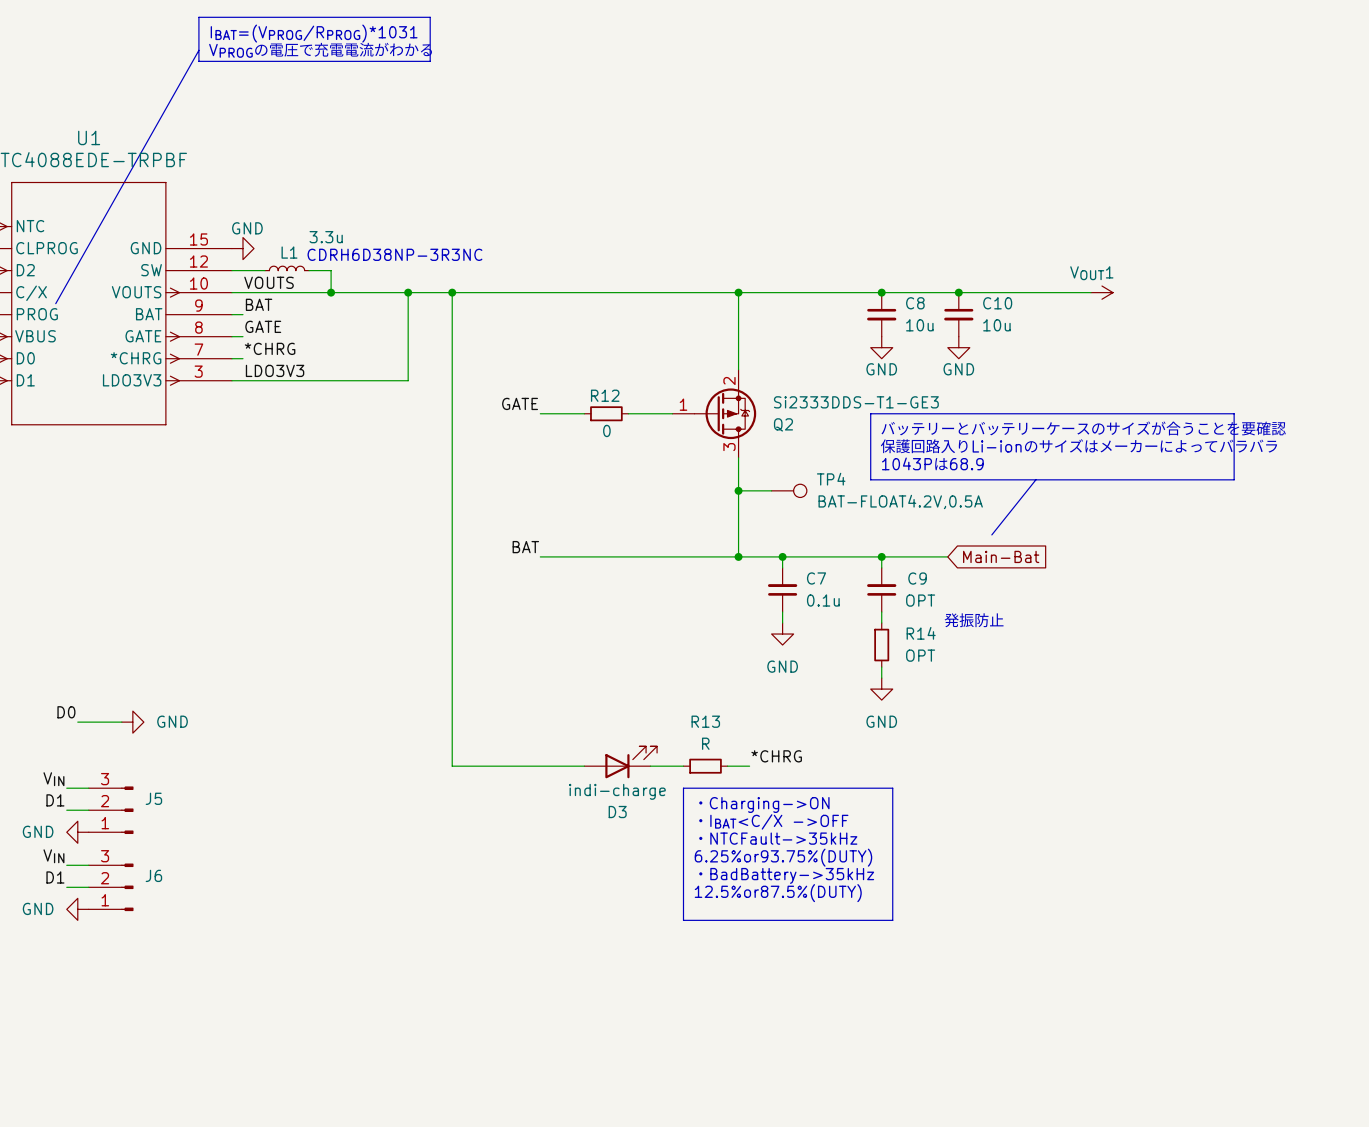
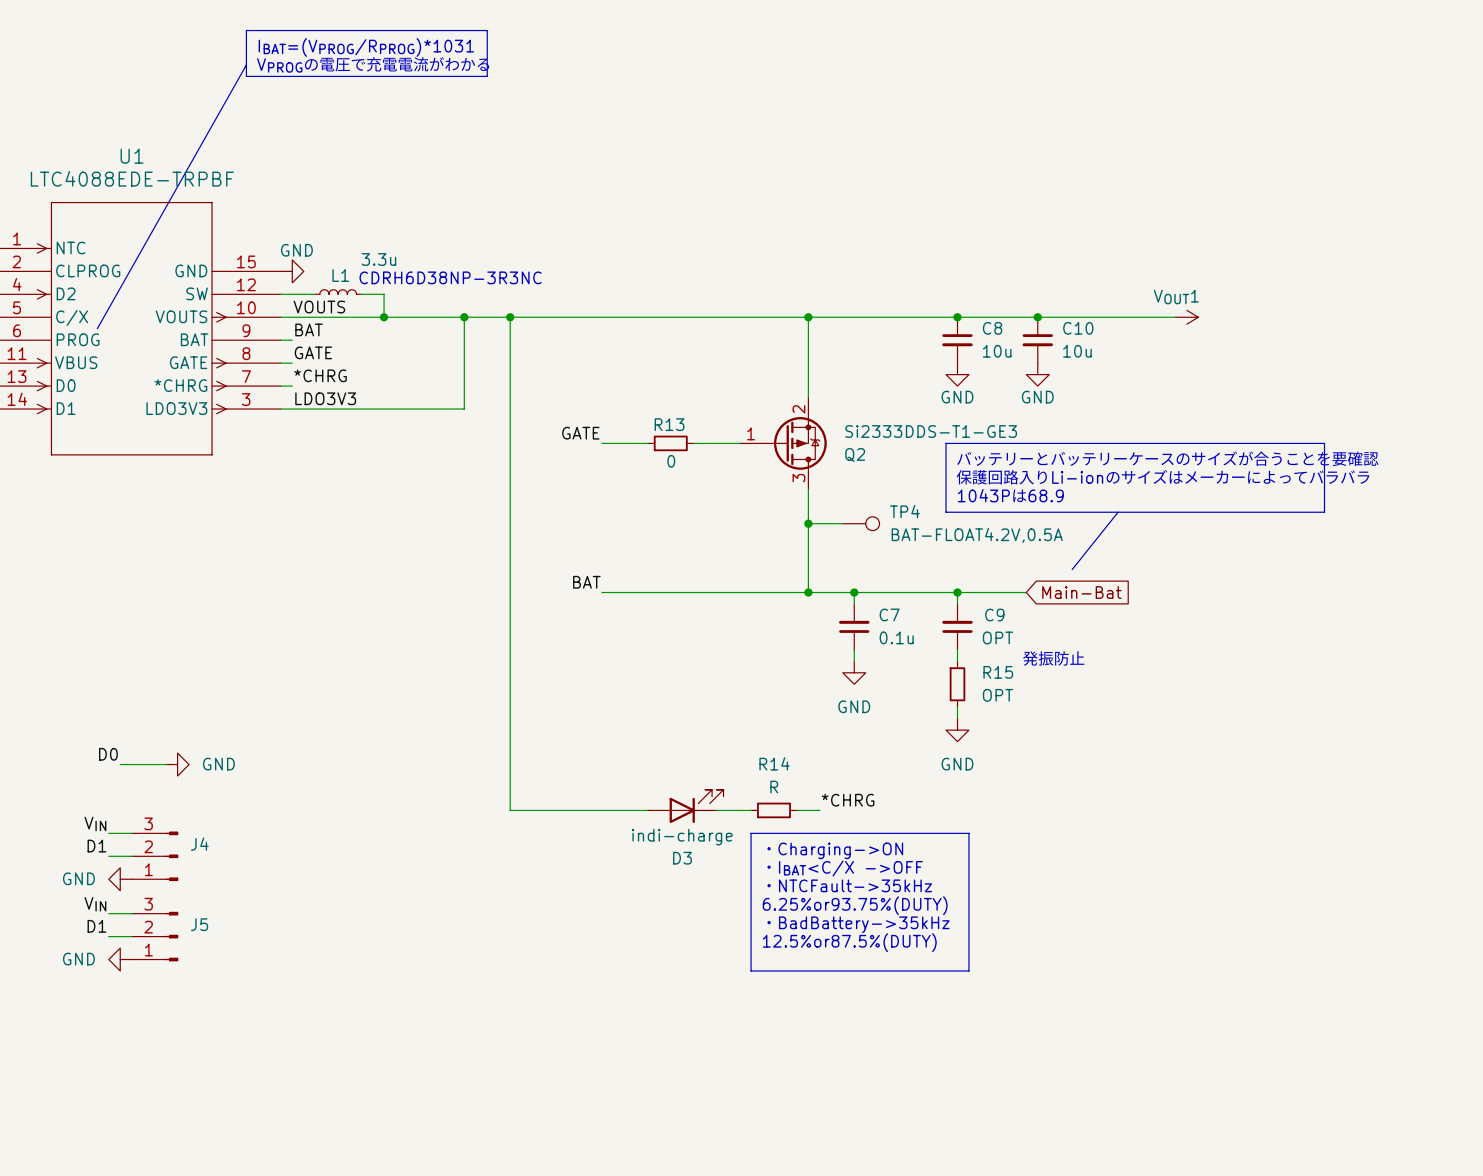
R12 name: R12 (605, 395) -> R13 (669, 424)
R14 name: R14 (921, 633) -> R15 (998, 672)
R13 name: R13 (705, 721) -> R14 (774, 763)
J5 name: J5 (153, 798) -> J4 (199, 844)
J6 name: J6 (153, 875) -> J5 (199, 924)

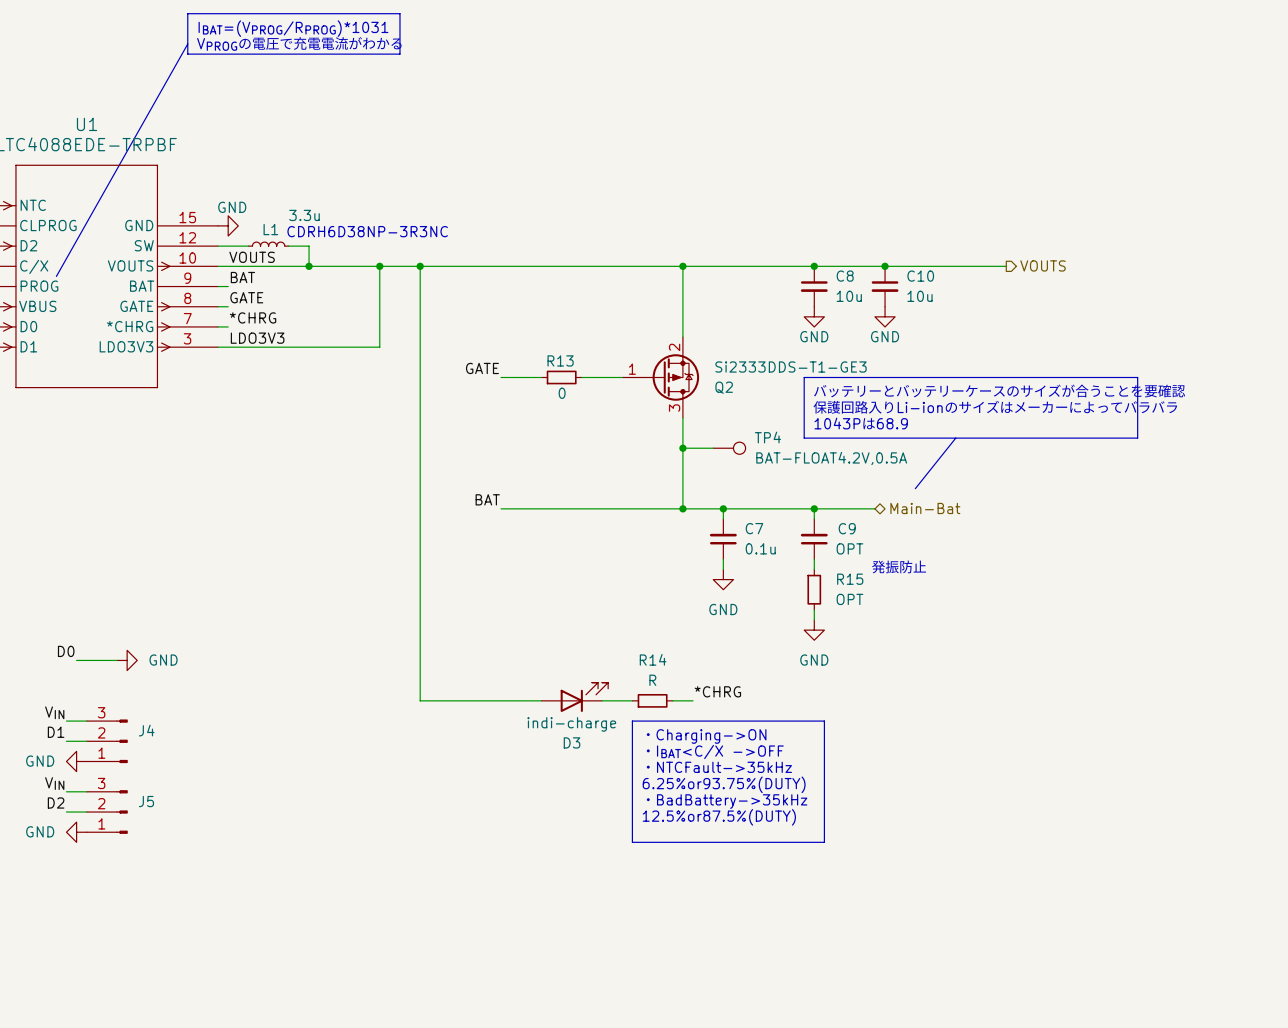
hierarchical label: none -> VOUTS (1043, 265)
power symbol: VOUT1 (1186, 317) -> none
global label: Main-Bat (1081, 592) -> none
hierarchical label: none -> Main-Bat (925, 508)
label: D1 (96, 926) -> D2 (56, 803)

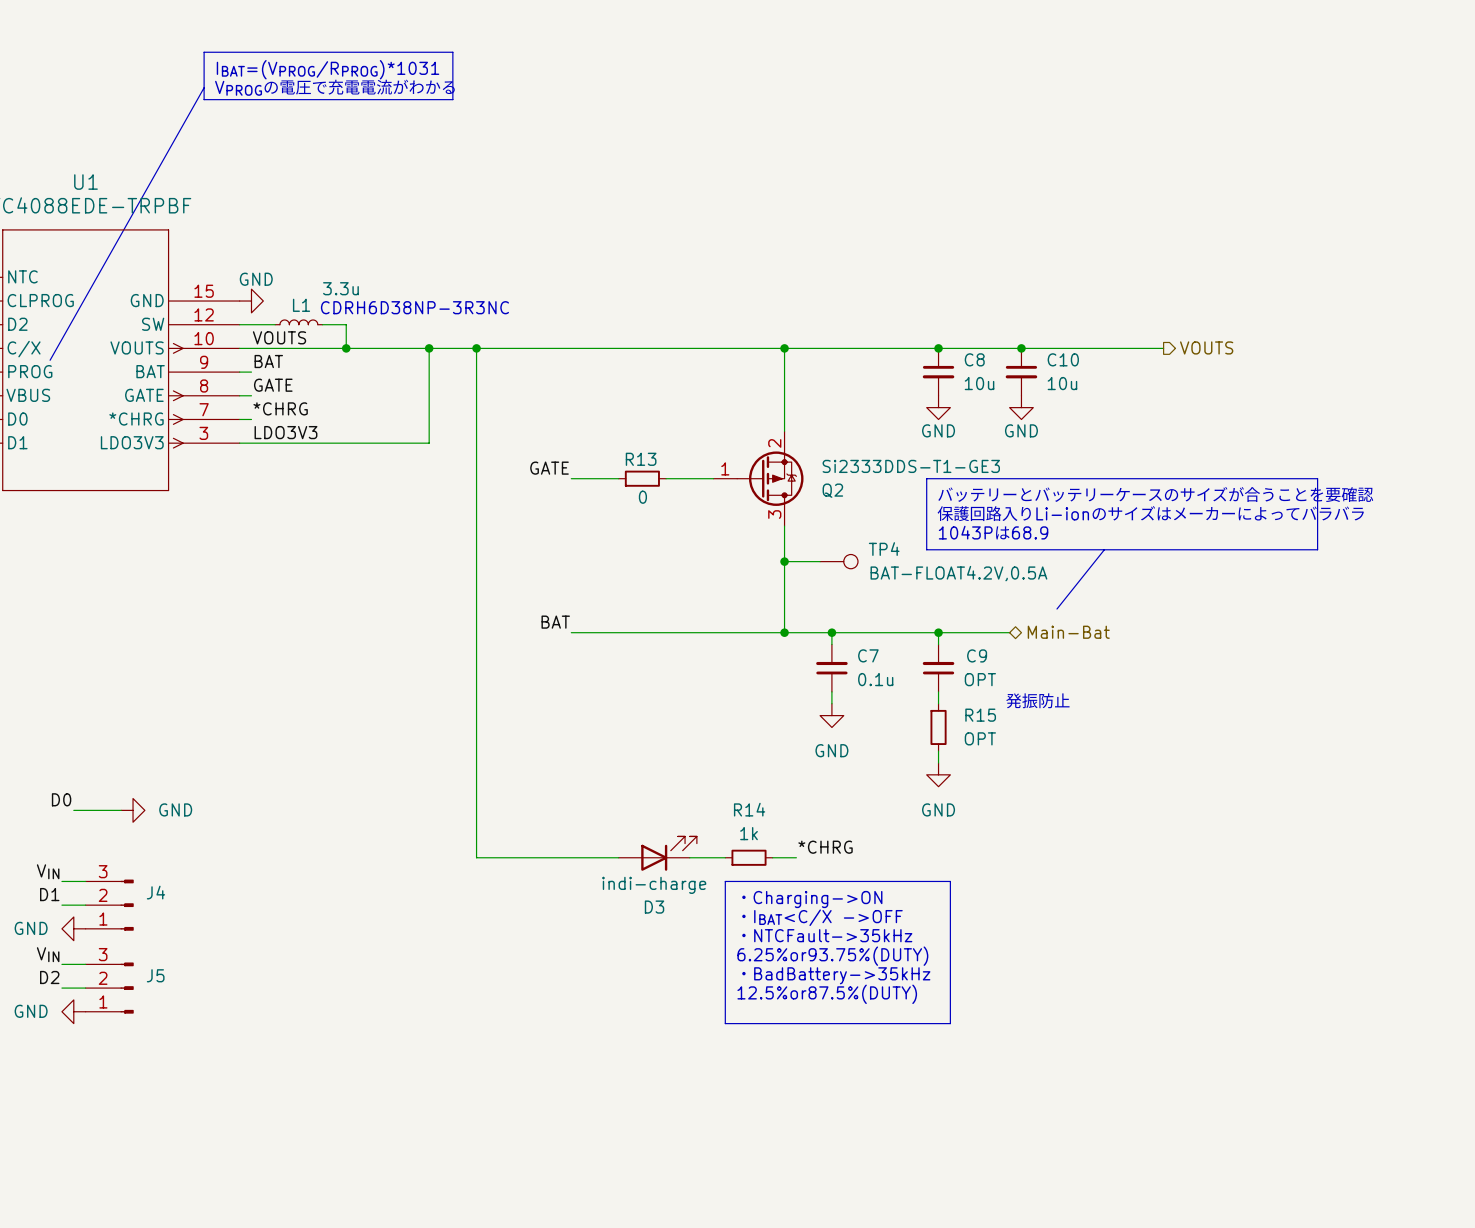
R14 value: R (652, 680) -> 1k (749, 833)

